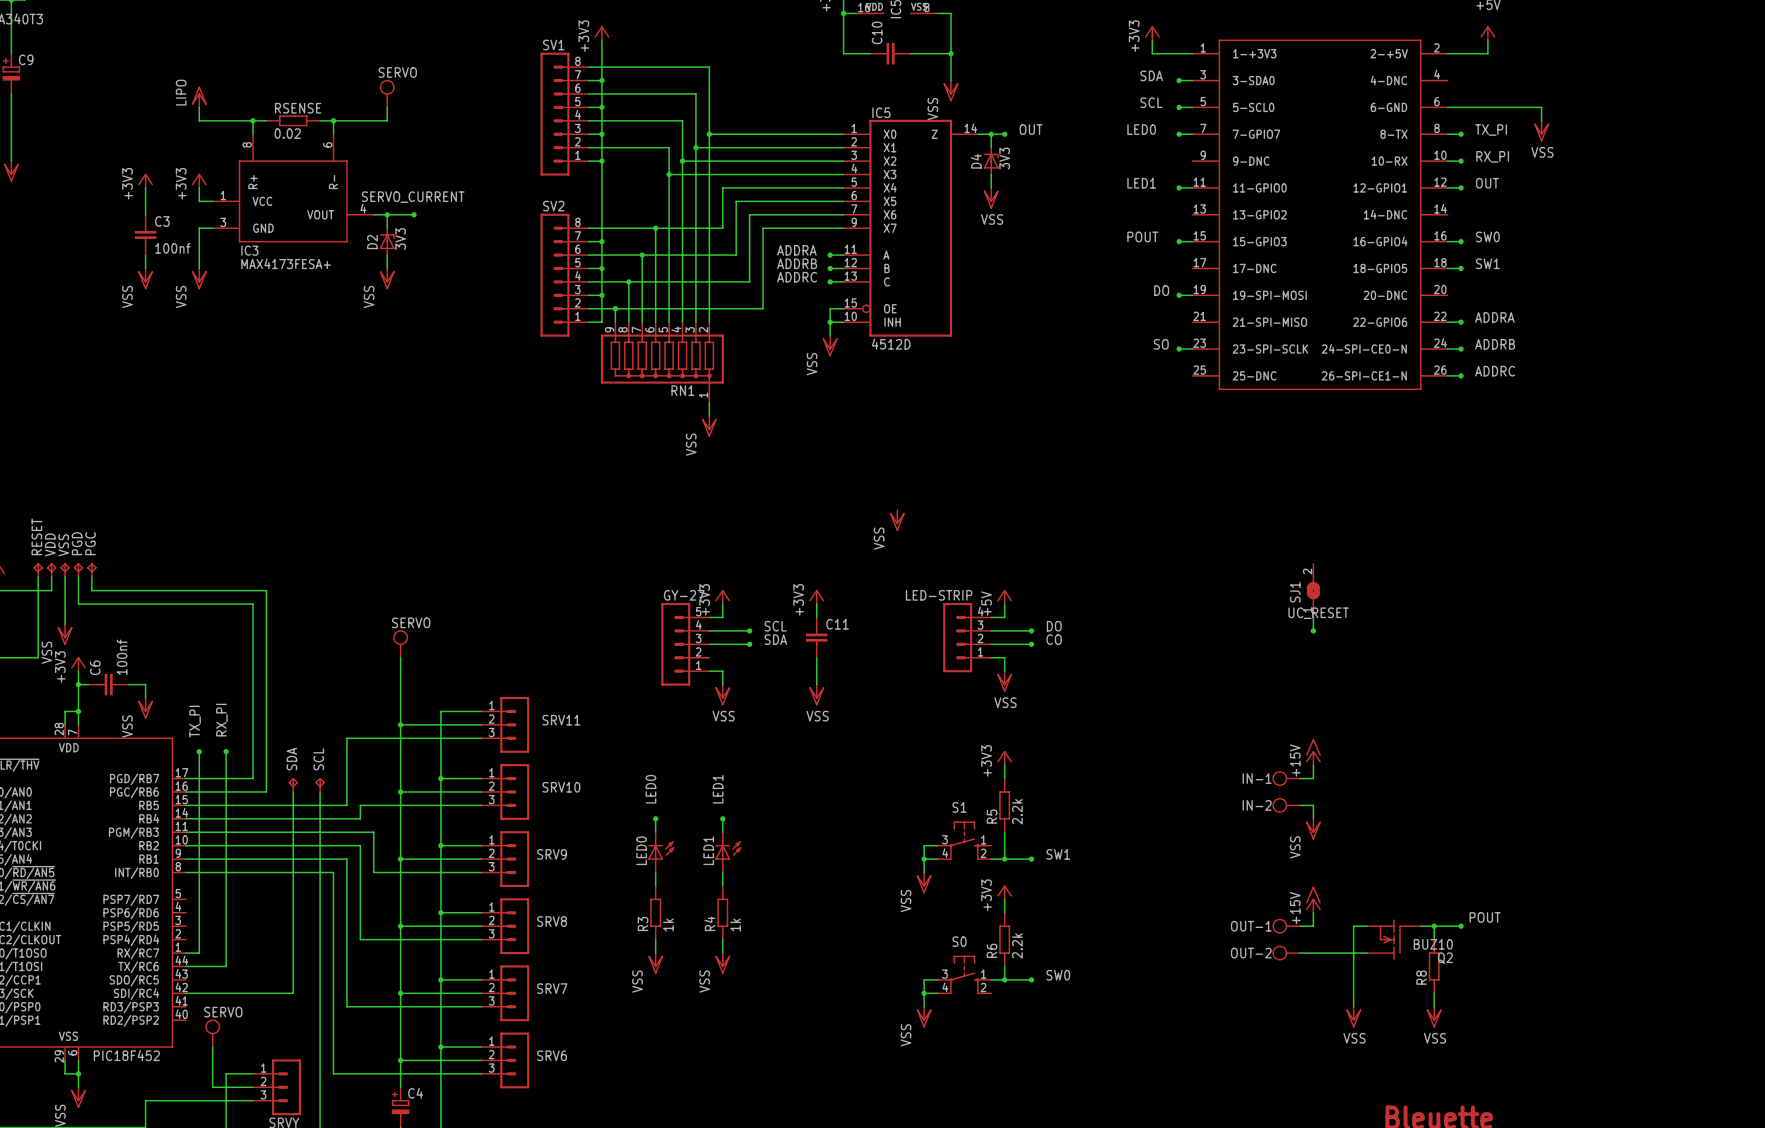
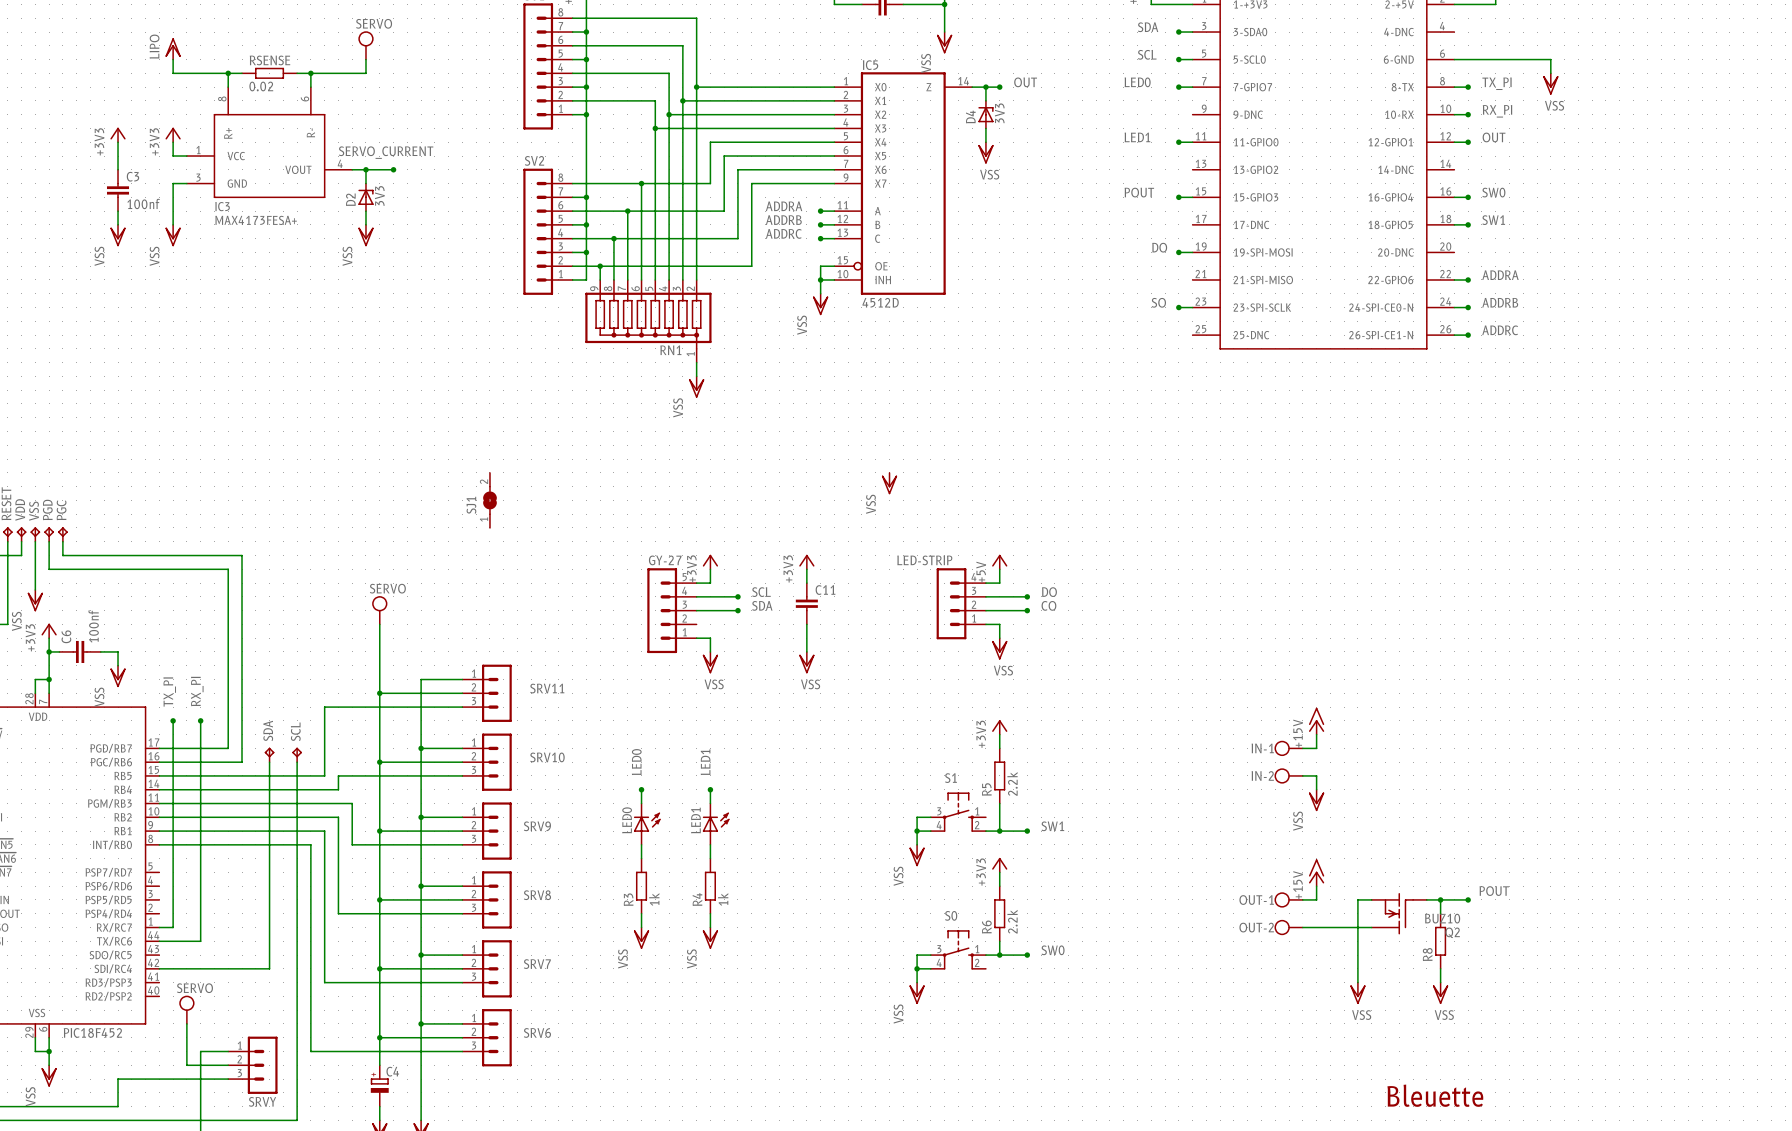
SJ1 position: (1313, 590) -> (489, 500)
label: UC_RESET (1318, 613) -> none
wire: (1313, 617) (1313, 630) -> none
junction: (1313, 630) -> none

